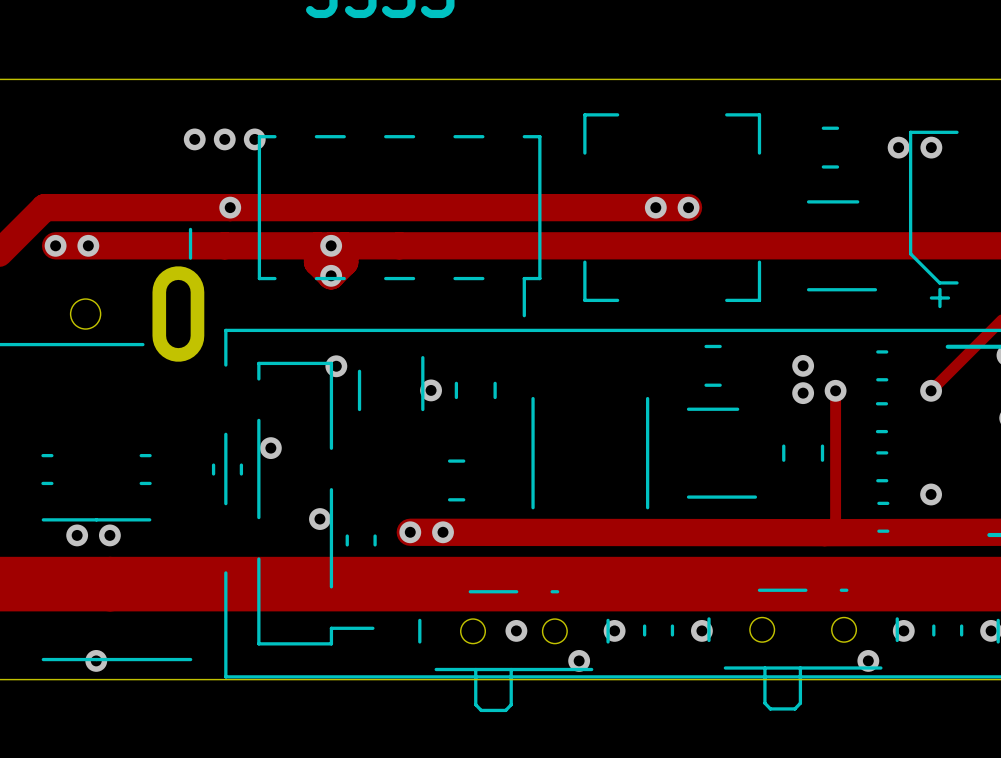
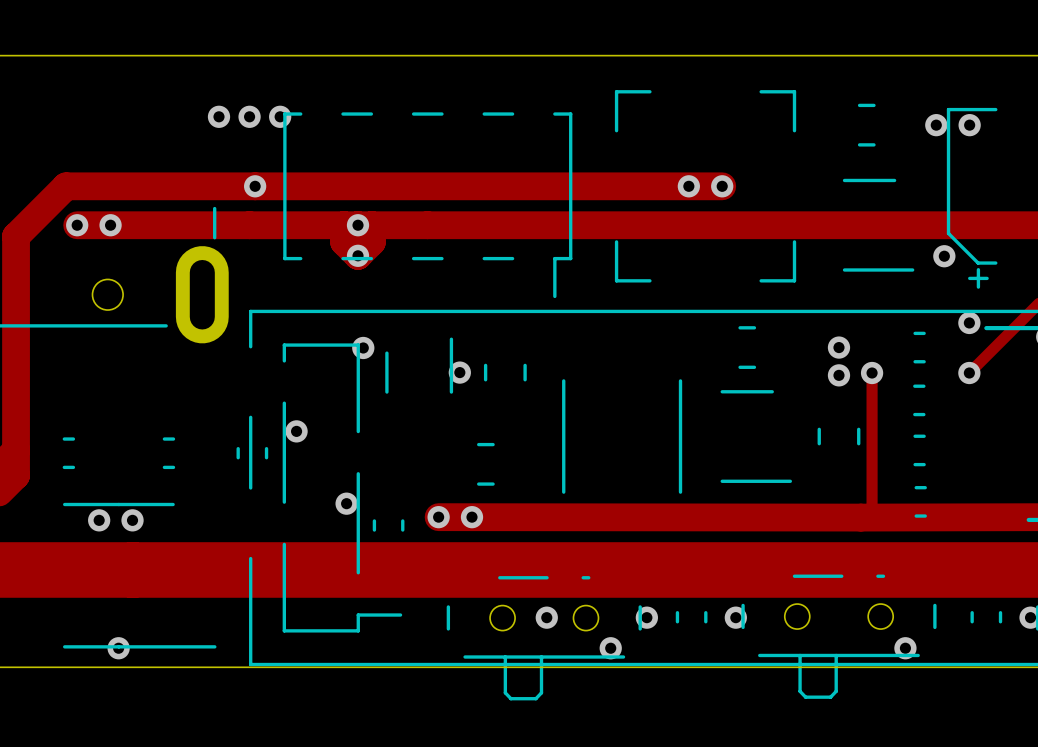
via: none -> (944, 256)
via: none -> (969, 322)
via: (931, 494) -> none
via: (903, 630) -> none

